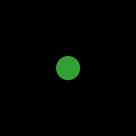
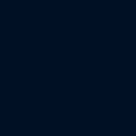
part: (68, 68) -> none

